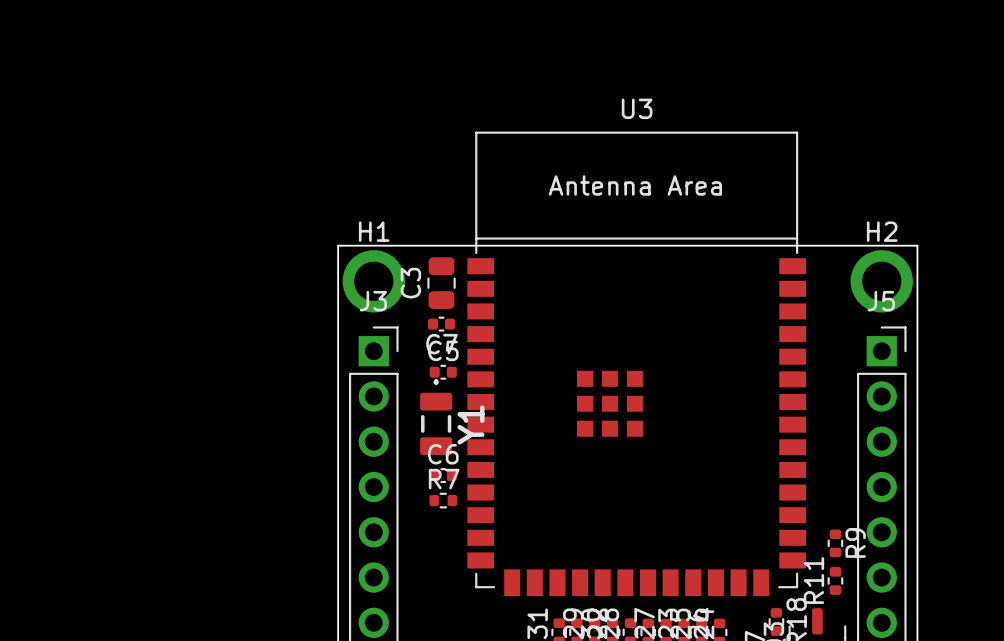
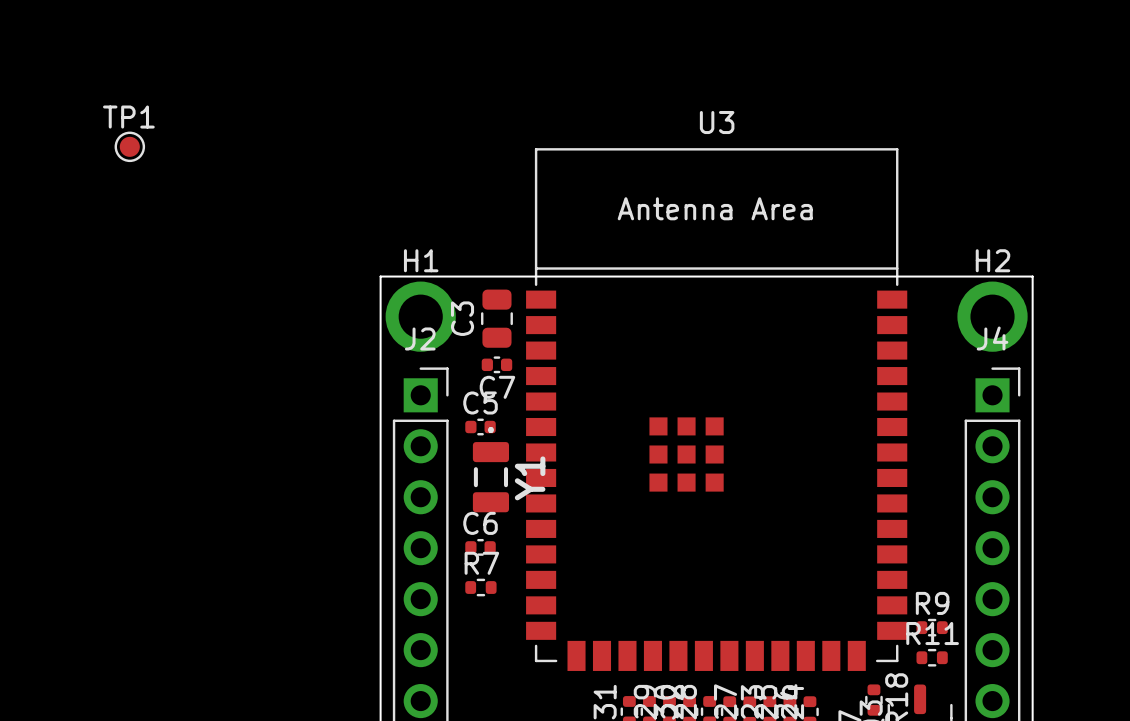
TP1: none -> (129, 146)
J3 name: J3 (373, 301) -> J2 (420, 338)
J5 name: J5 (881, 301) -> J4 (992, 338)
C5 position: (443, 372) -> (480, 427)
C6 position: (443, 475) -> (480, 547)
R7 position: (443, 500) -> (480, 587)
R9 rotation: 0° (835, 543) -> 90° clockwise (932, 627)
R11 rotation: 0° (835, 580) -> 90° clockwise (932, 657)

